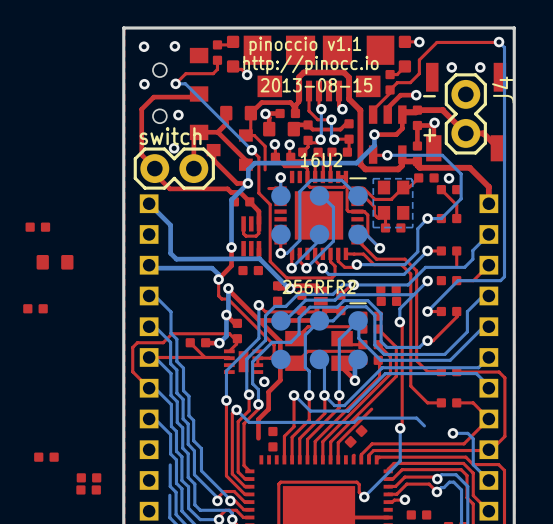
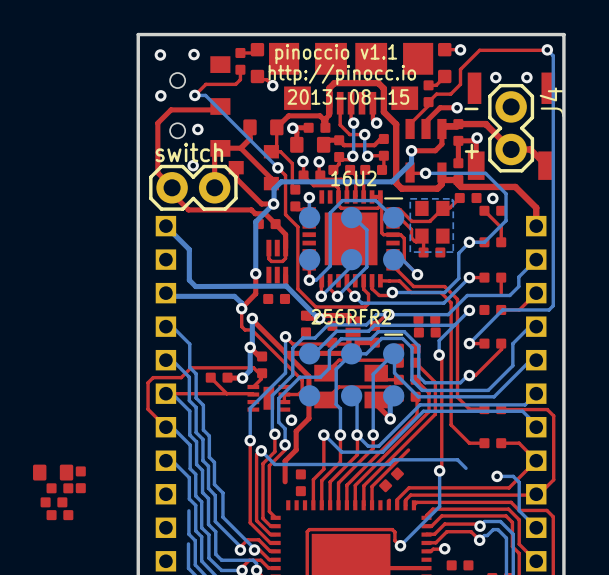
part: none -> (295, 198)
part: (37, 227) -> none
part position: (55, 262) -> (53, 472)
part: (35, 308) -> none
part: none -> (80, 479)
part: none -> (59, 488)
part: none -> (59, 515)
part: (89, 477) -> none
part: (88, 489) -> none

